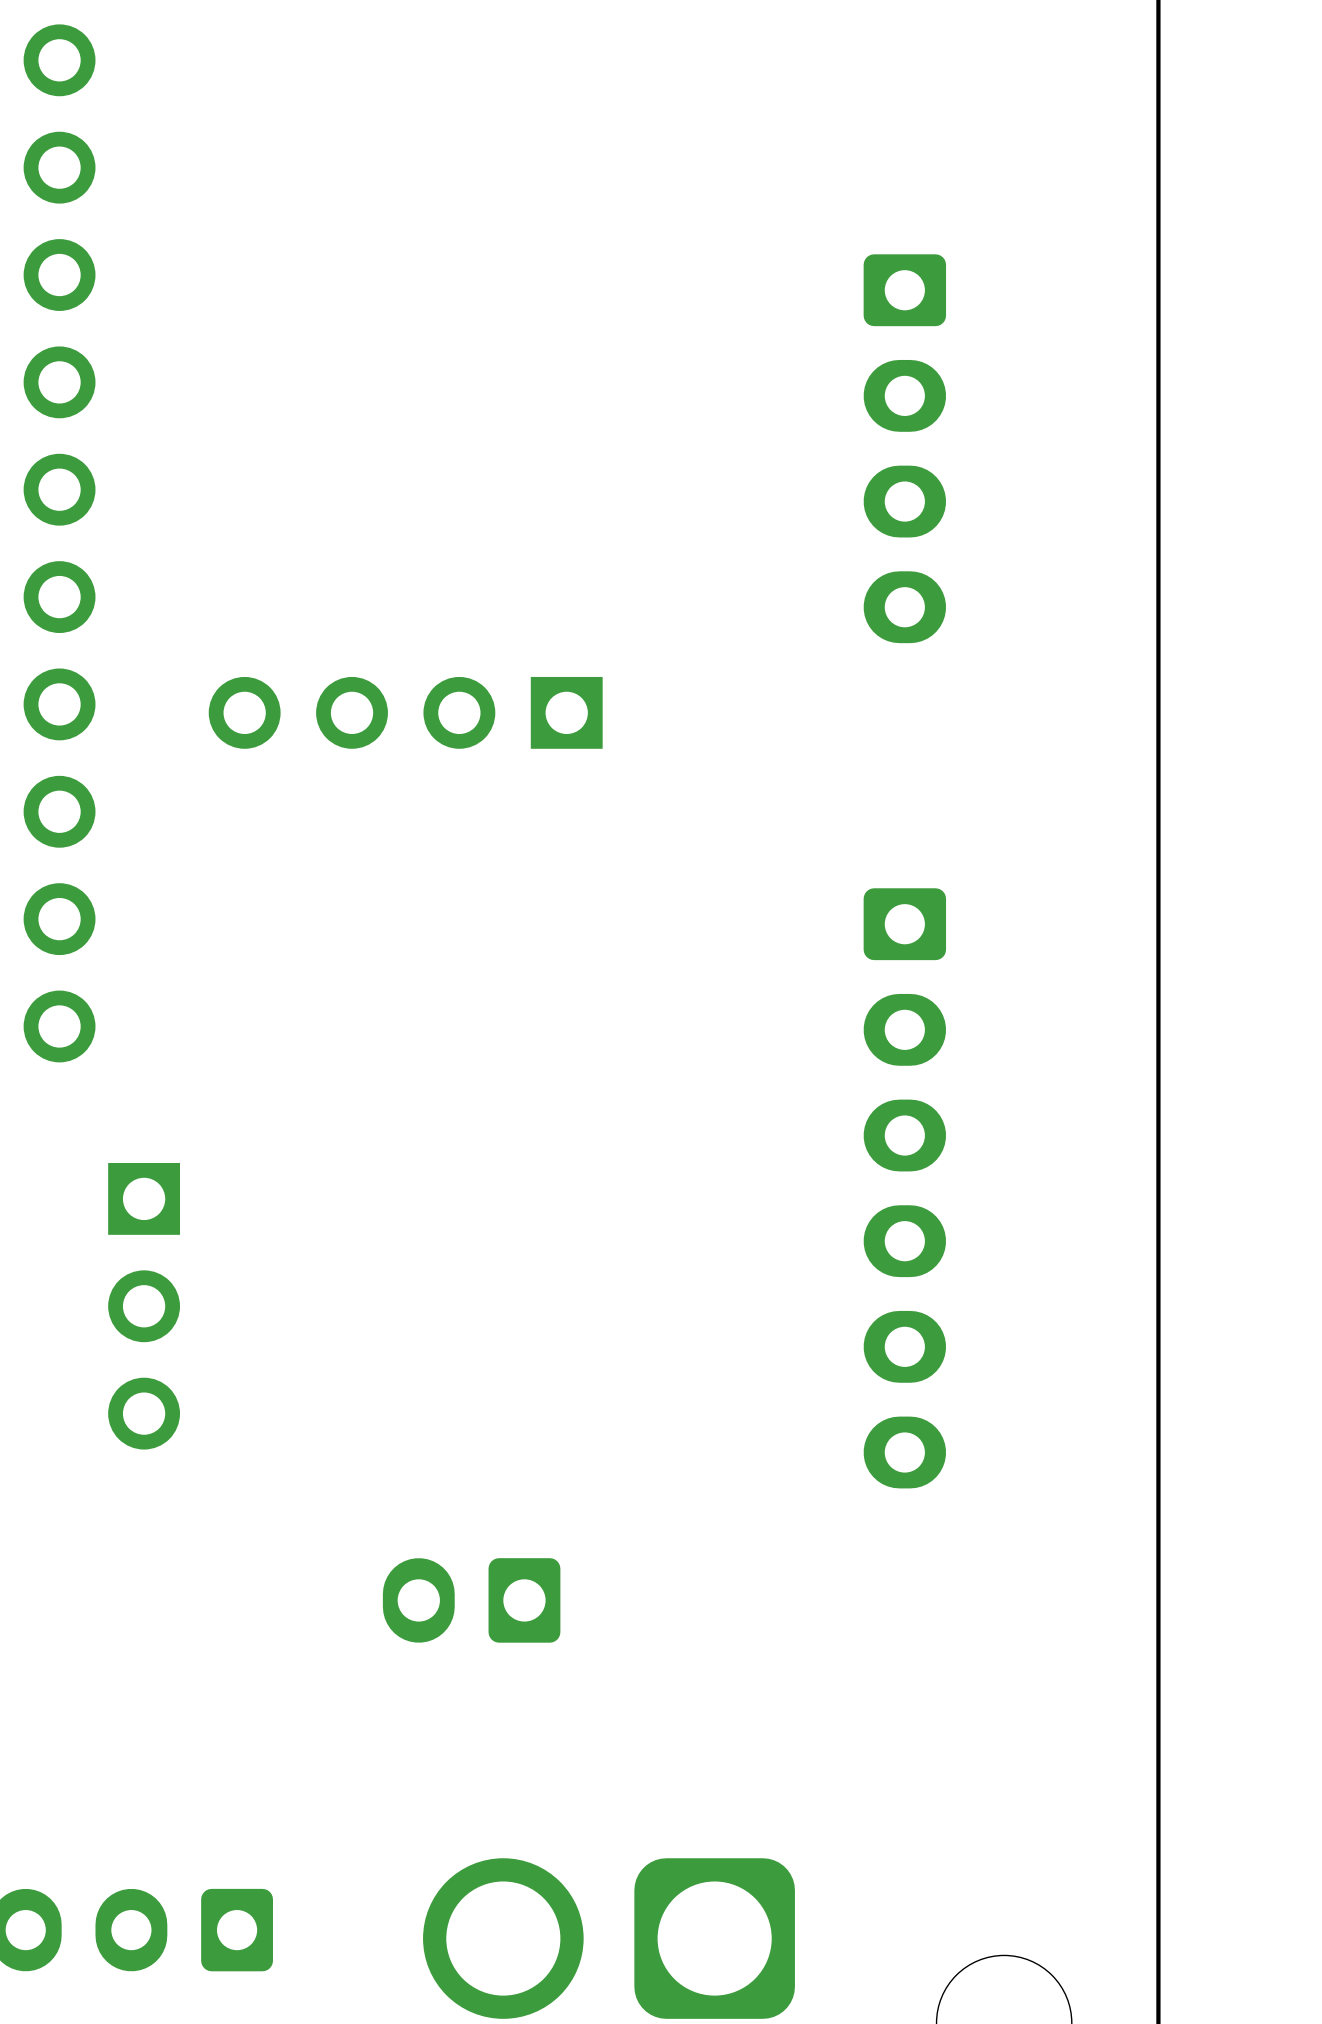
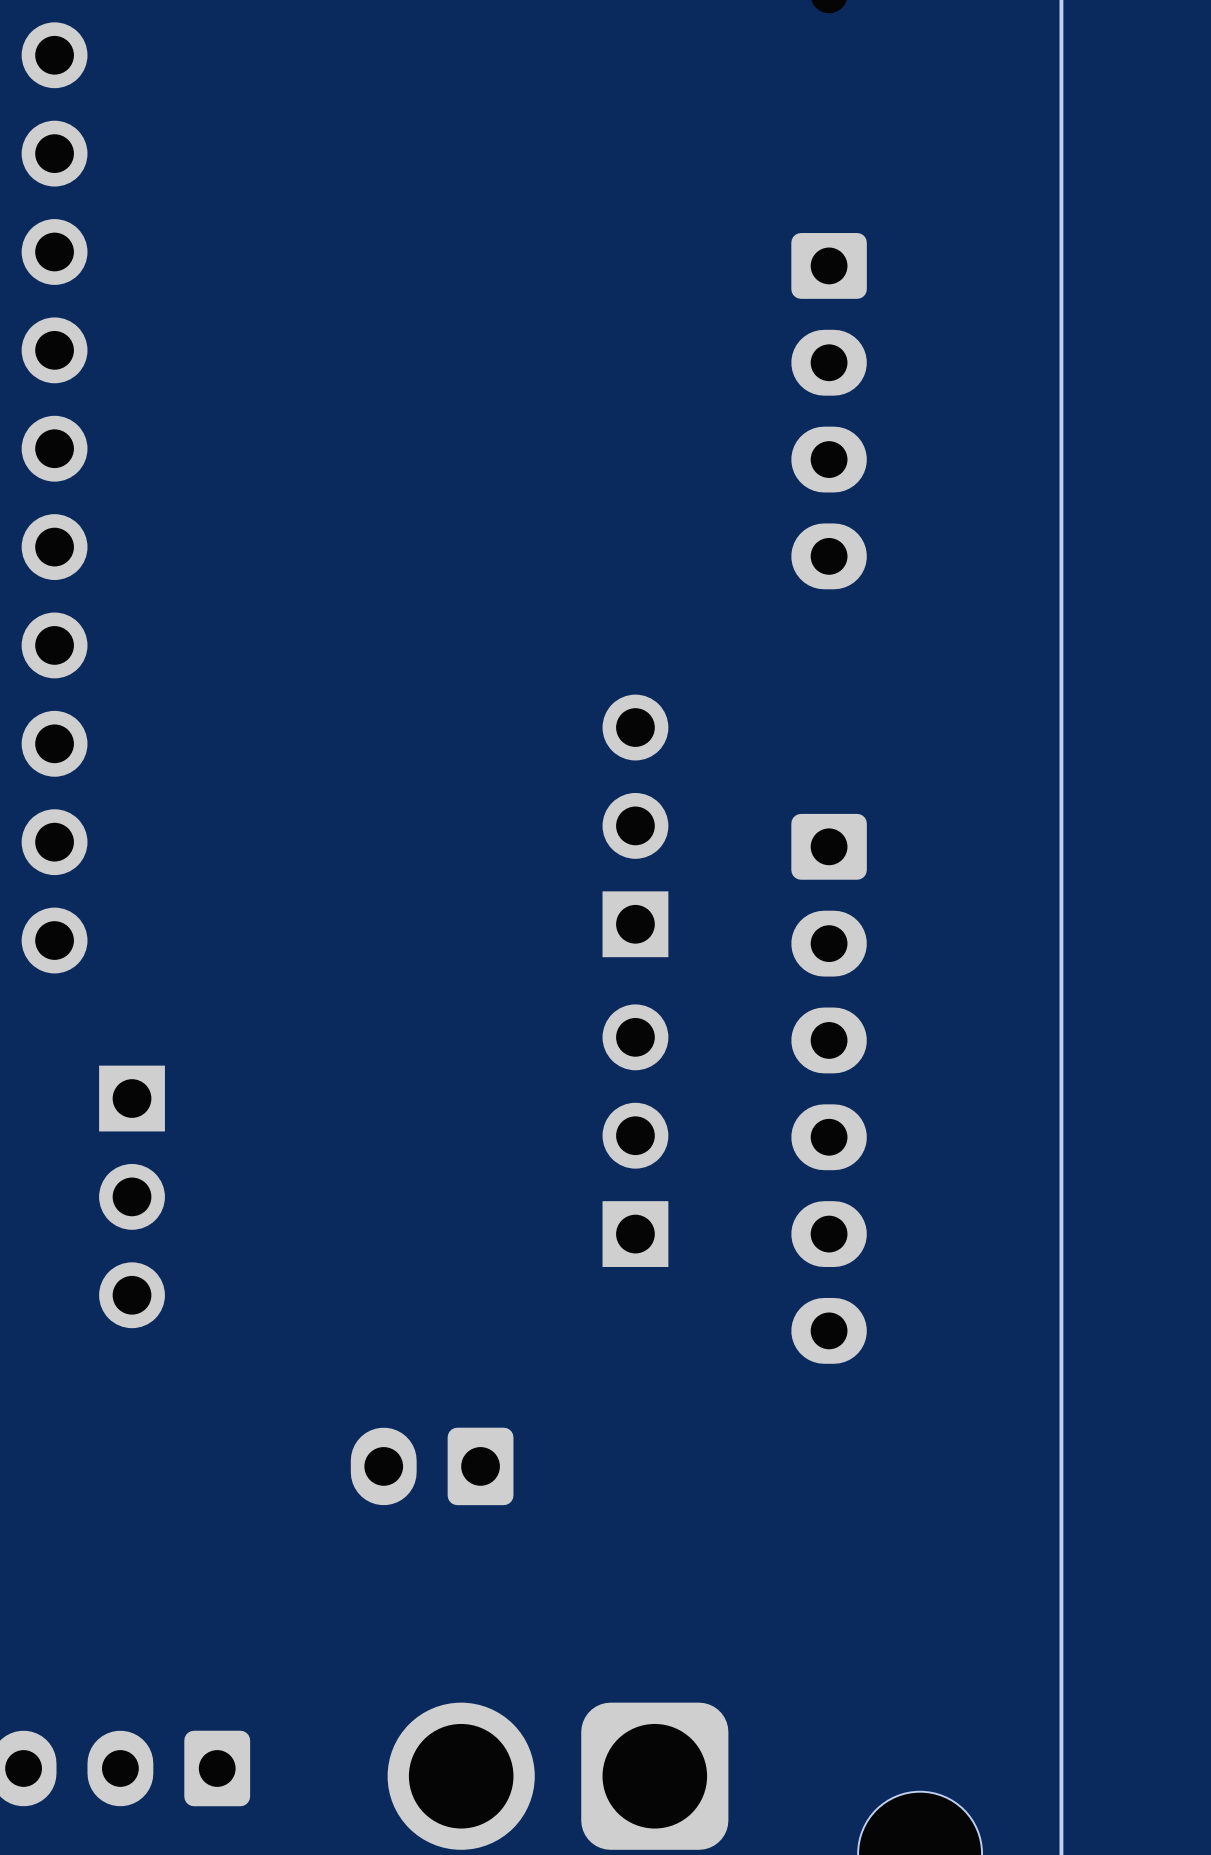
part: (405, 712) -> none
part: none -> (635, 825)
part: none -> (635, 1135)

